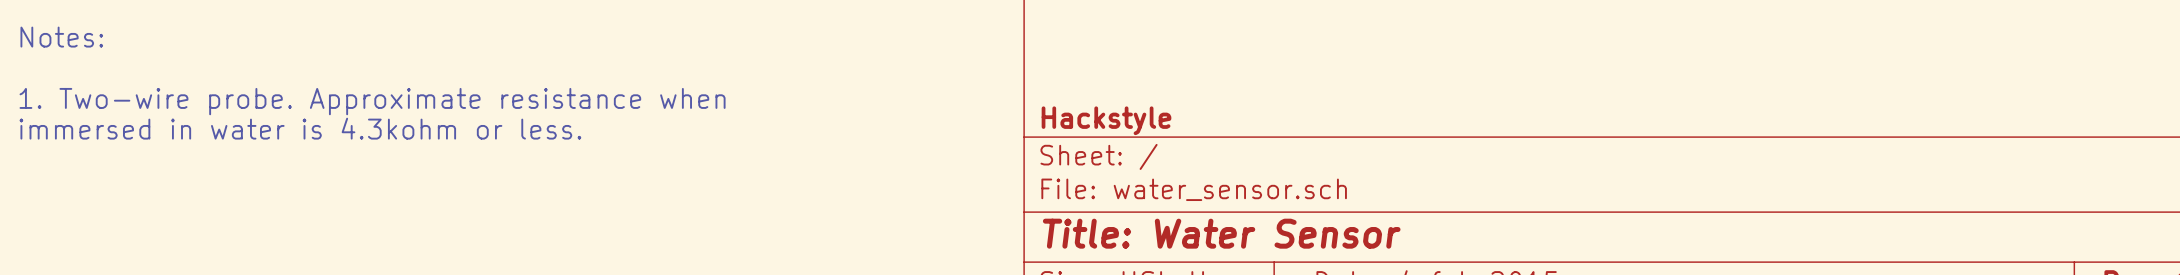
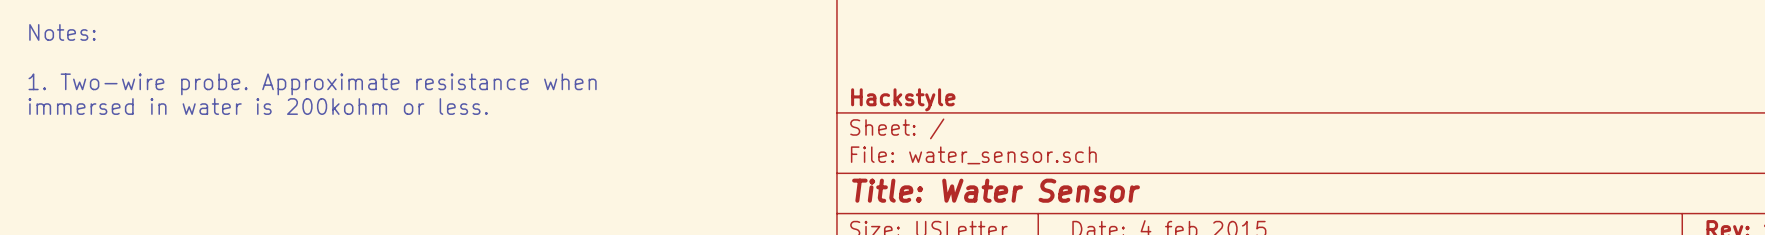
text: immersed in water is 4.3kohm or less. (300, 128) -> immersed in water is 200kohm or less. (258, 106)

